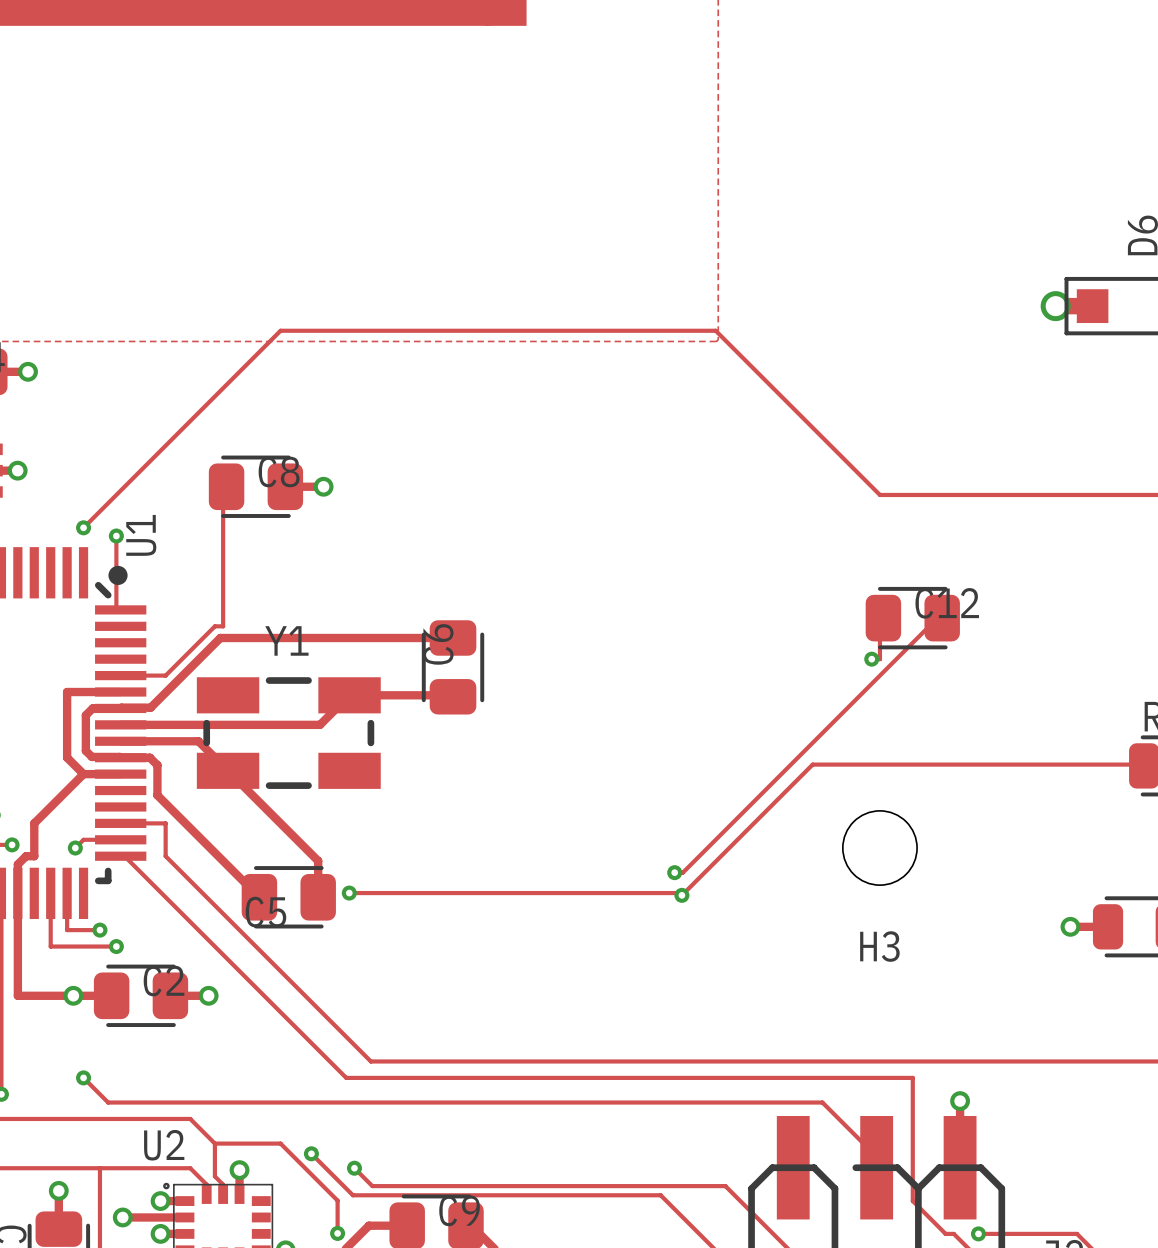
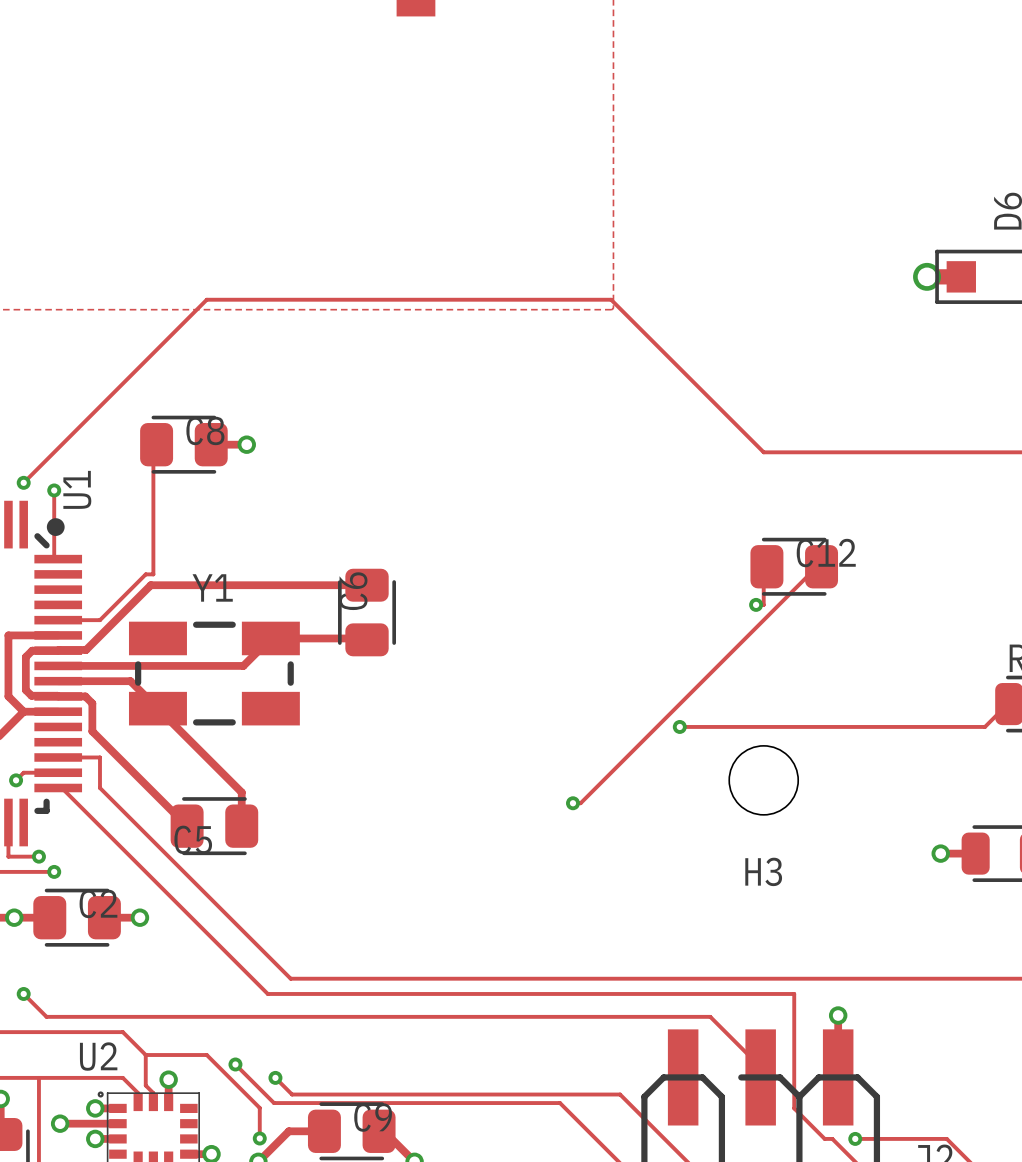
track: (1144, 765) (812, 764) (684, 893) (349, 893) -> (1009, 704) (984, 726) (679, 726)
via: (349, 893) -> none
via position: (681, 895) -> (679, 726)

